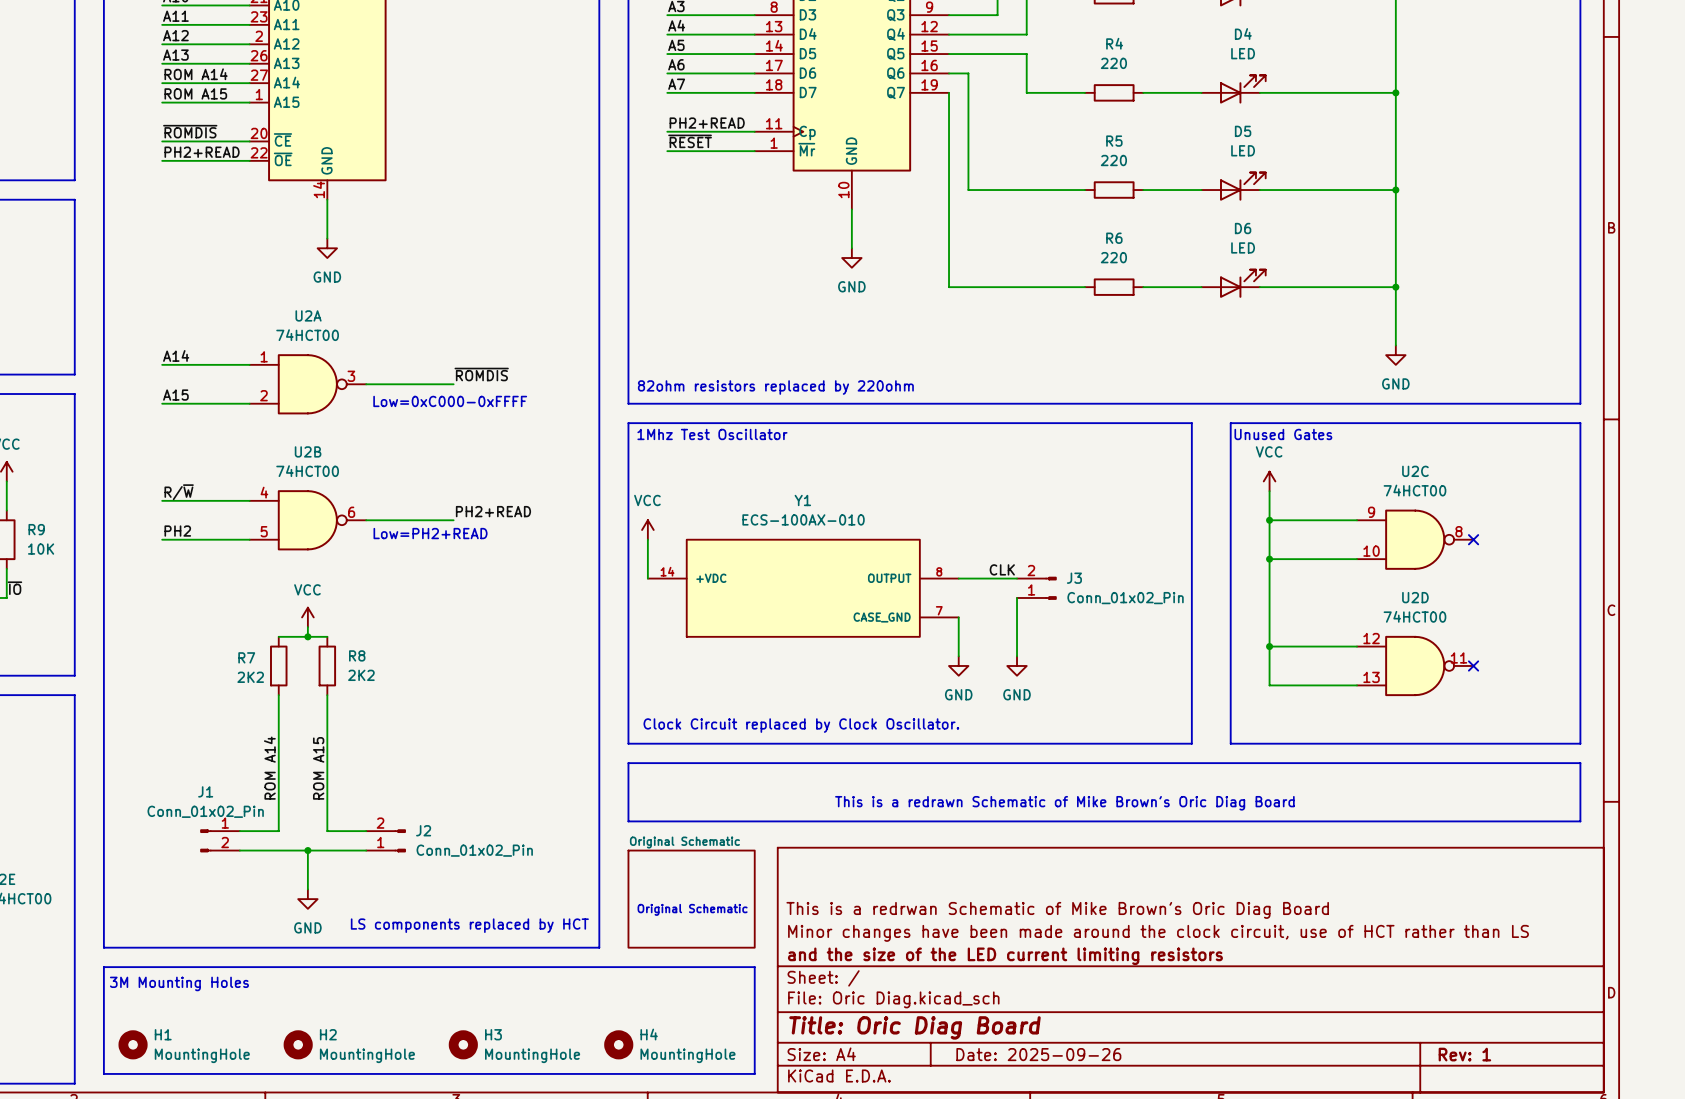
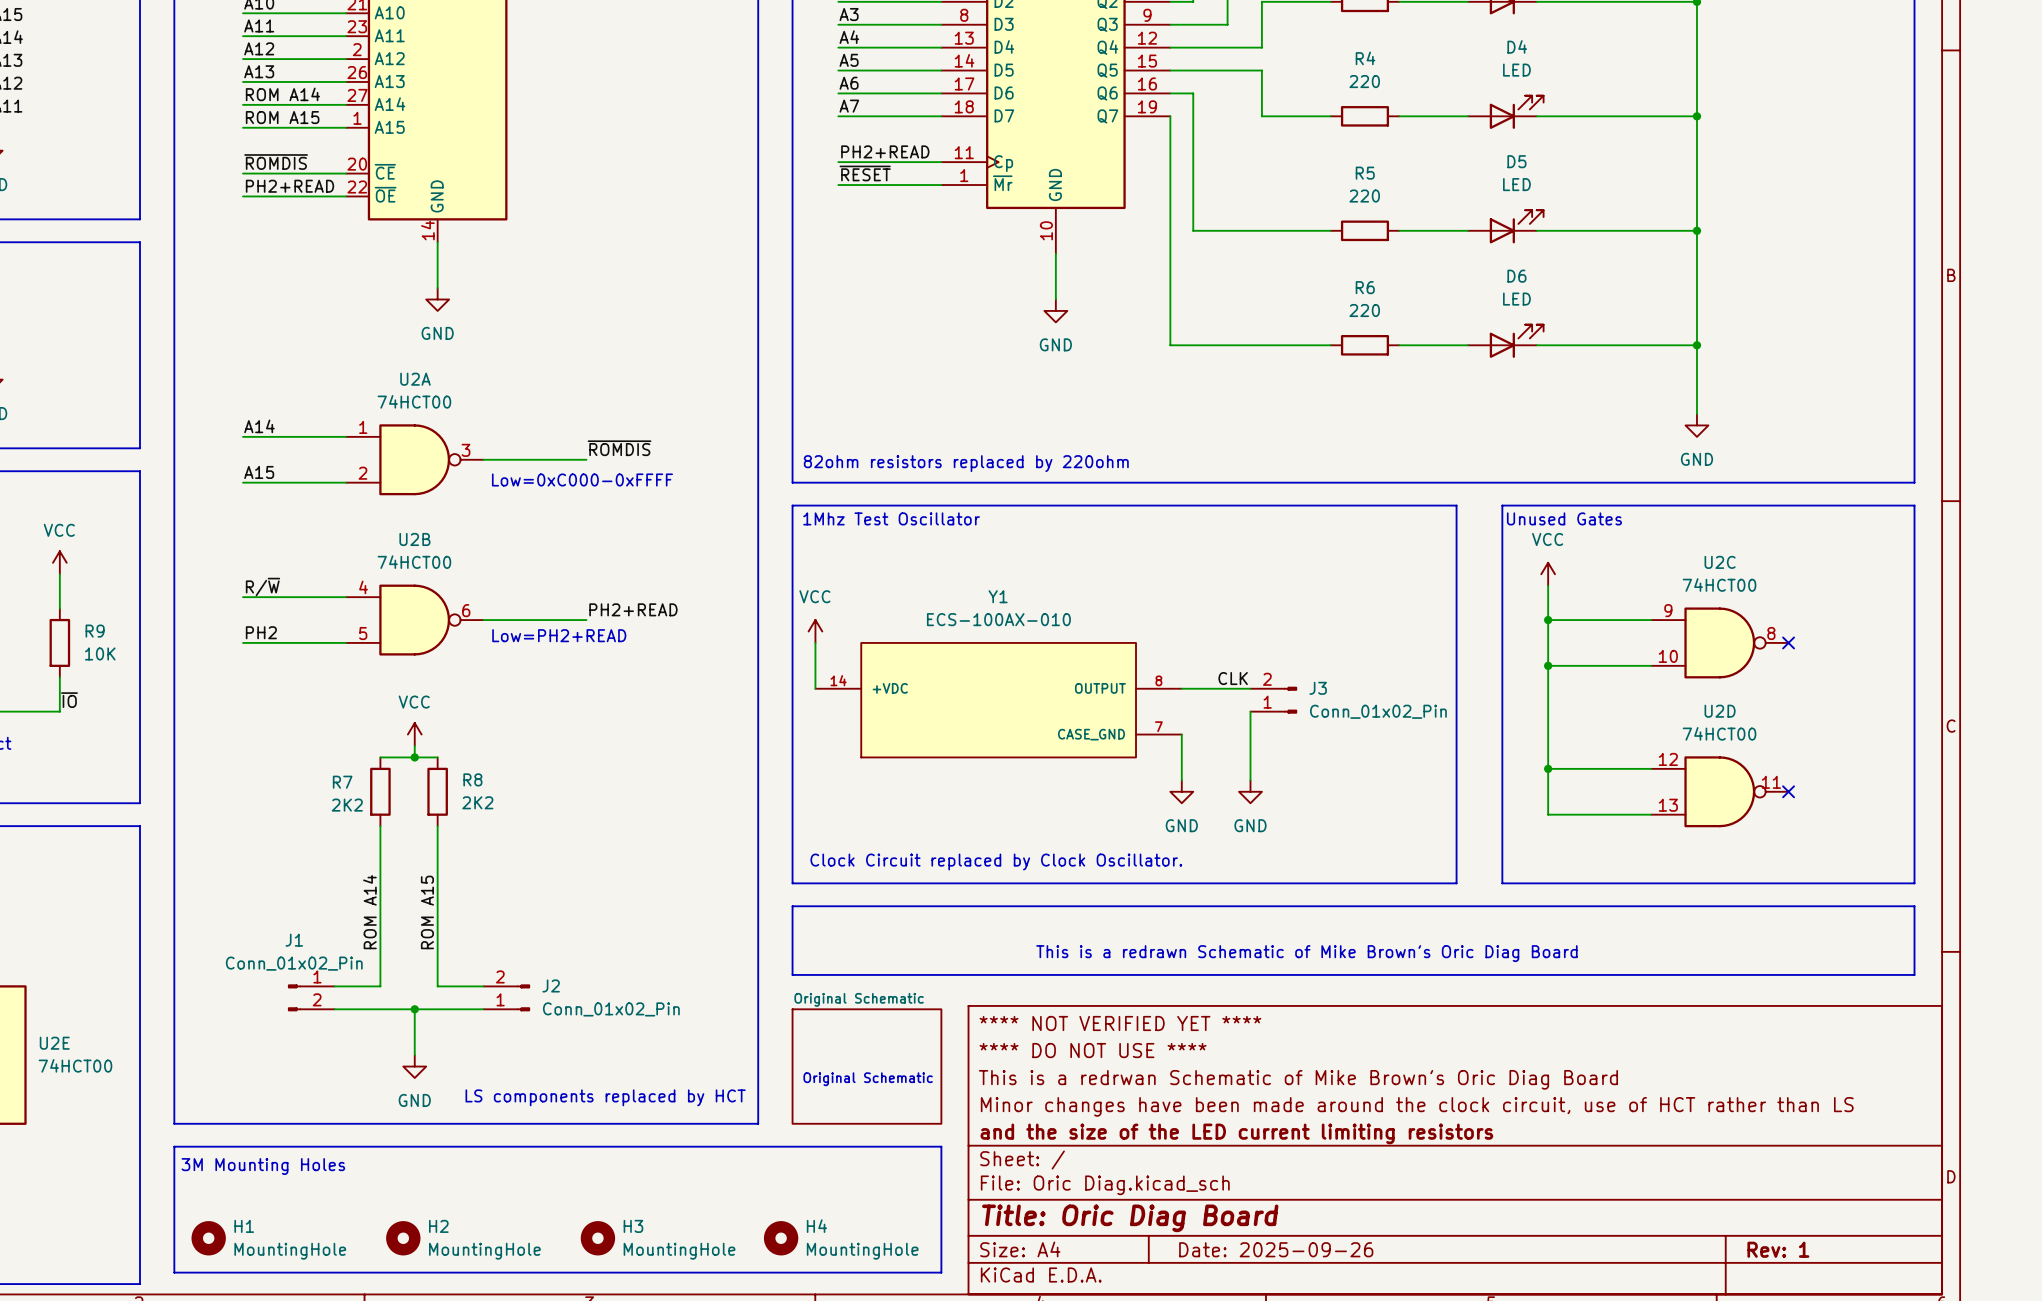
title block: none -> **** NOT VERIFIED YET **** (1120, 1023)
title block: none -> **** DO NOT USE **** (1093, 1050)

